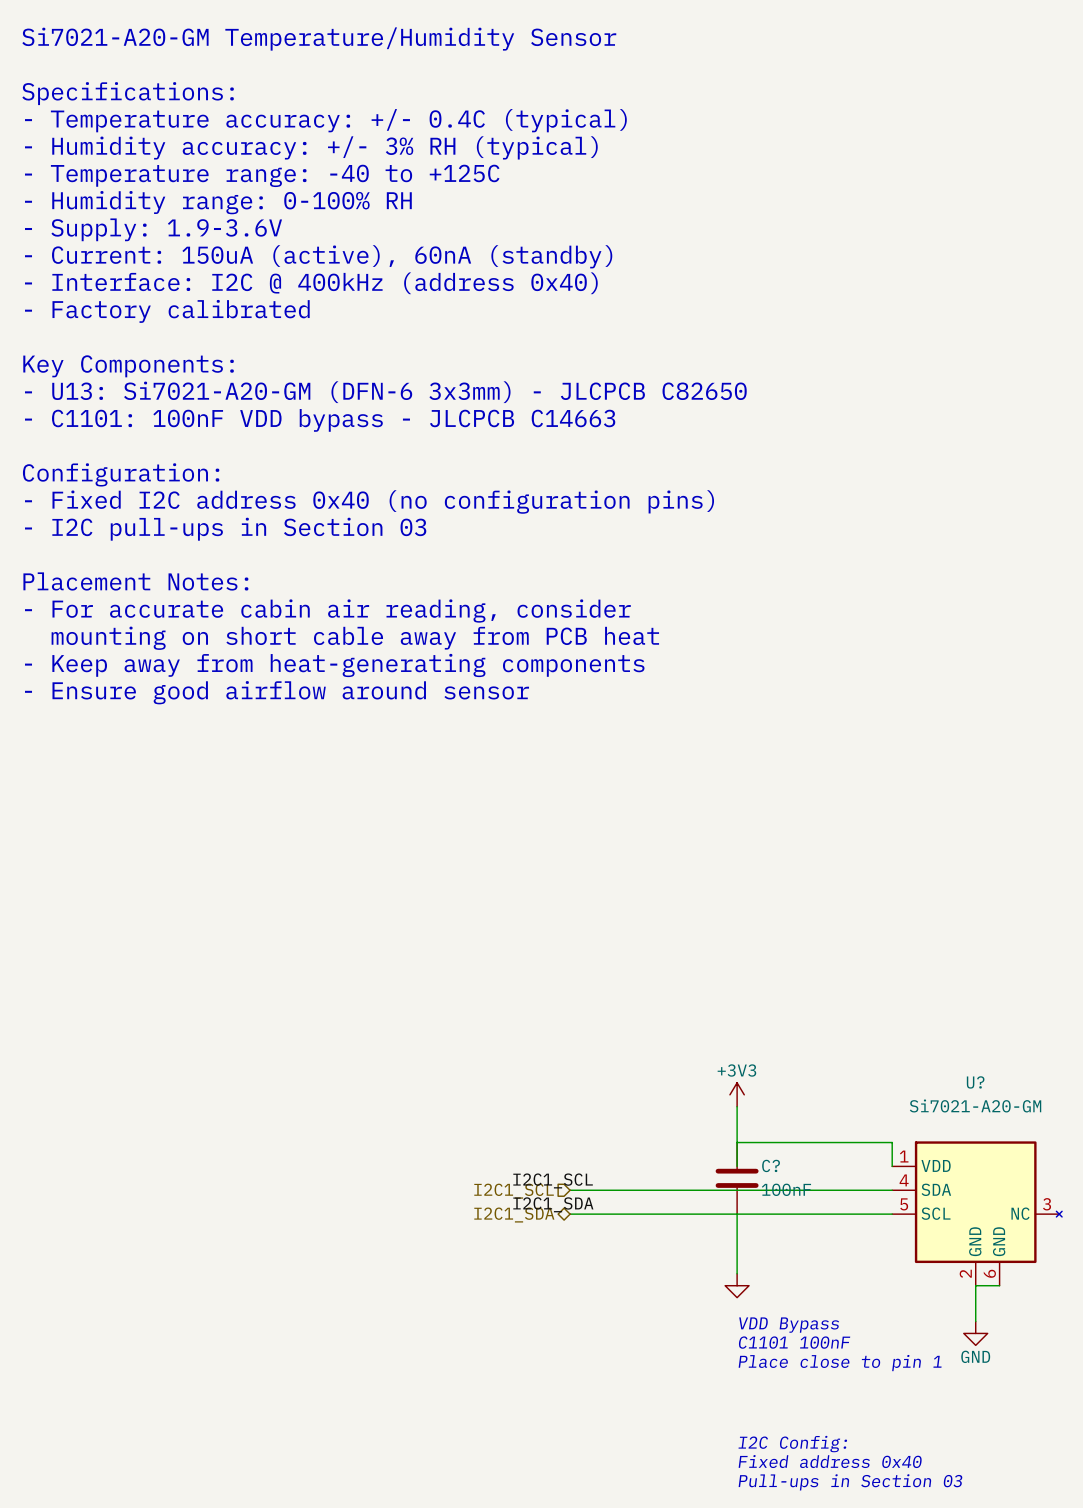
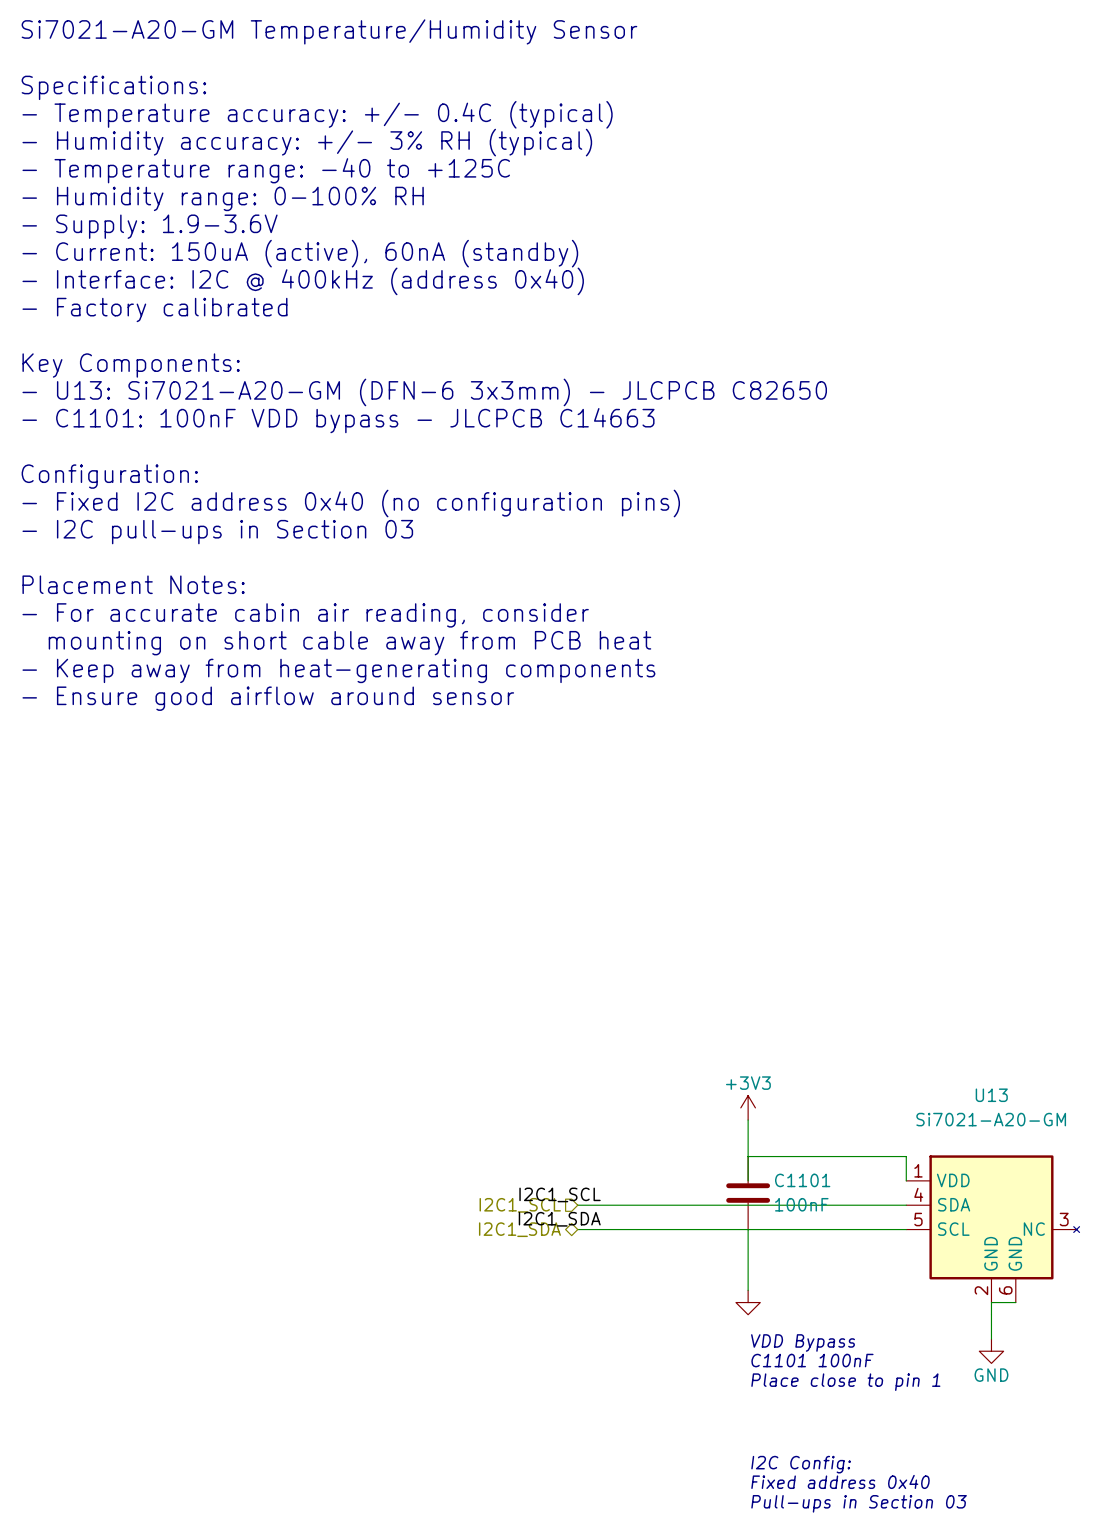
U? name: U? (975, 1082) -> U13 (991, 1095)
C? name: C? (771, 1165) -> C1101 (802, 1180)

